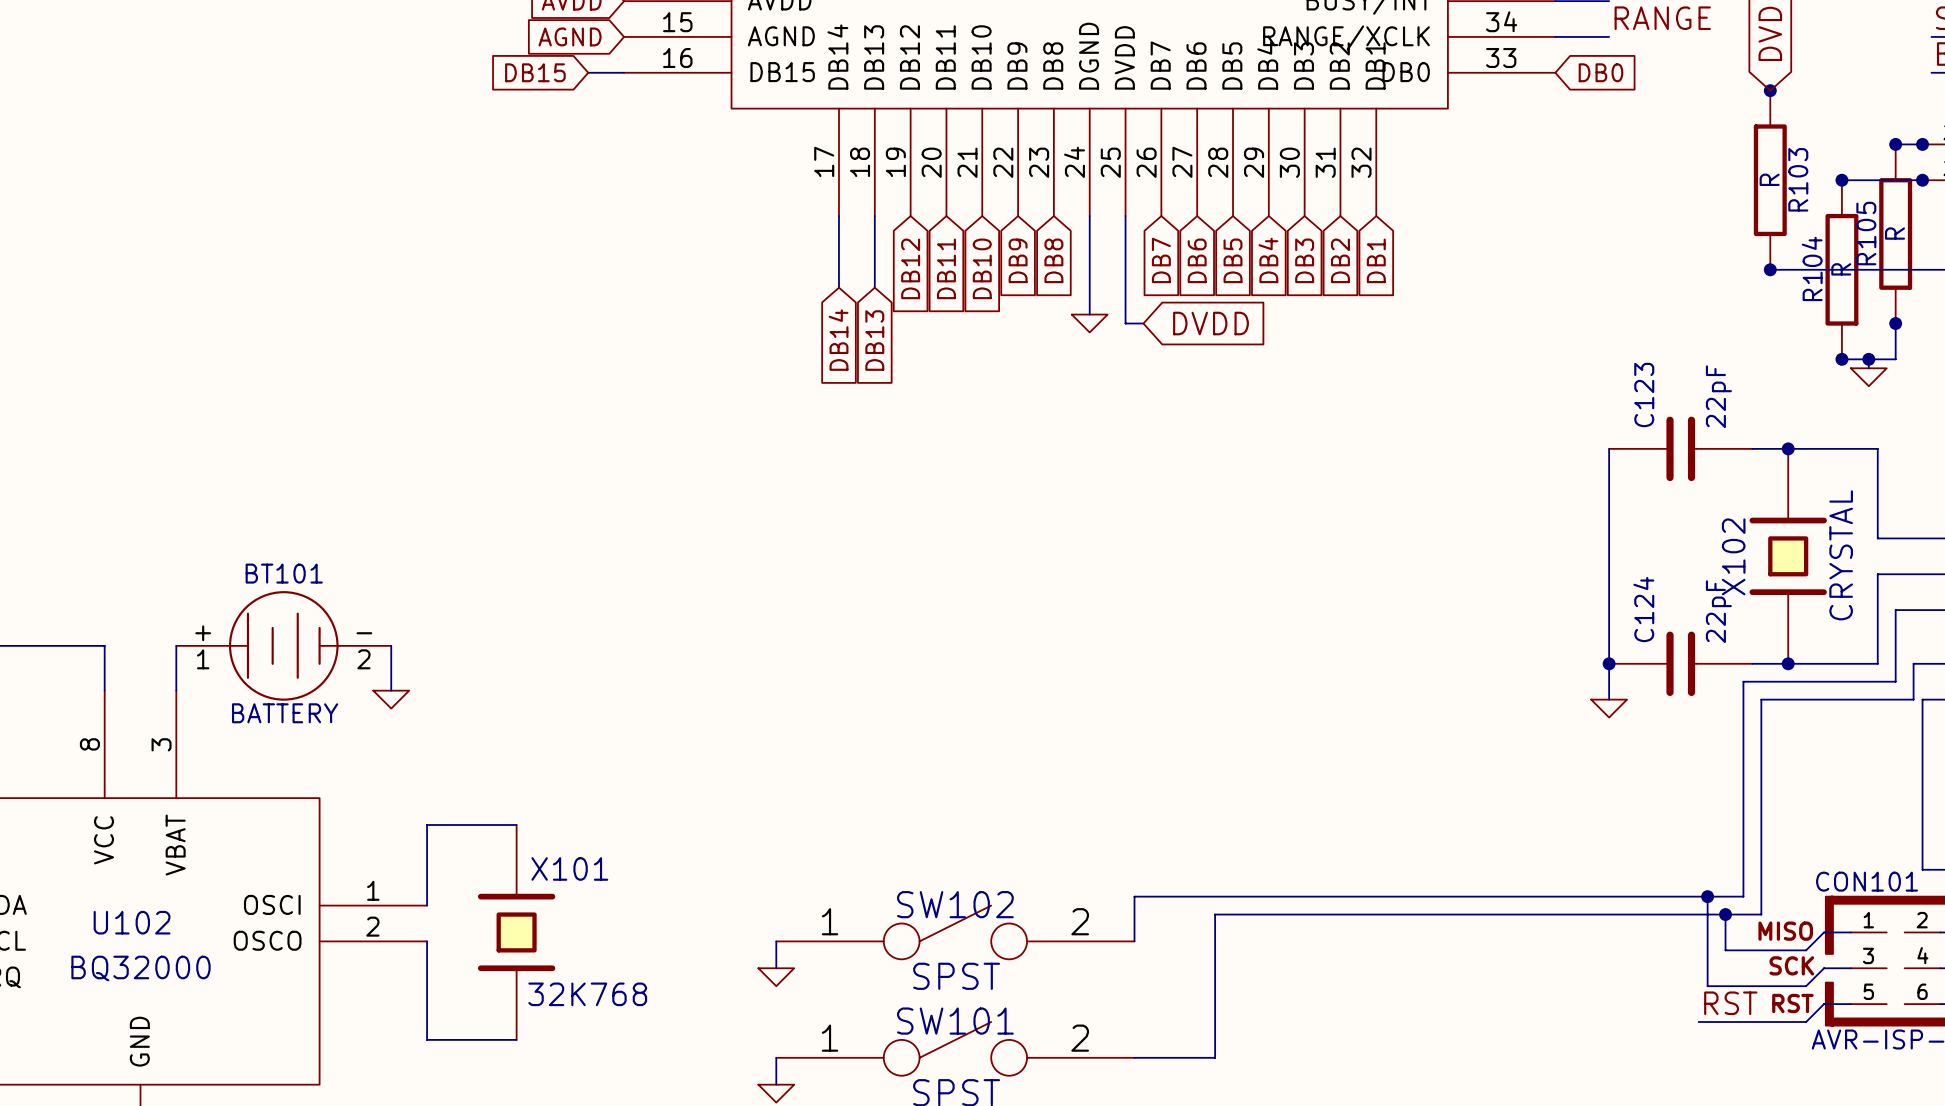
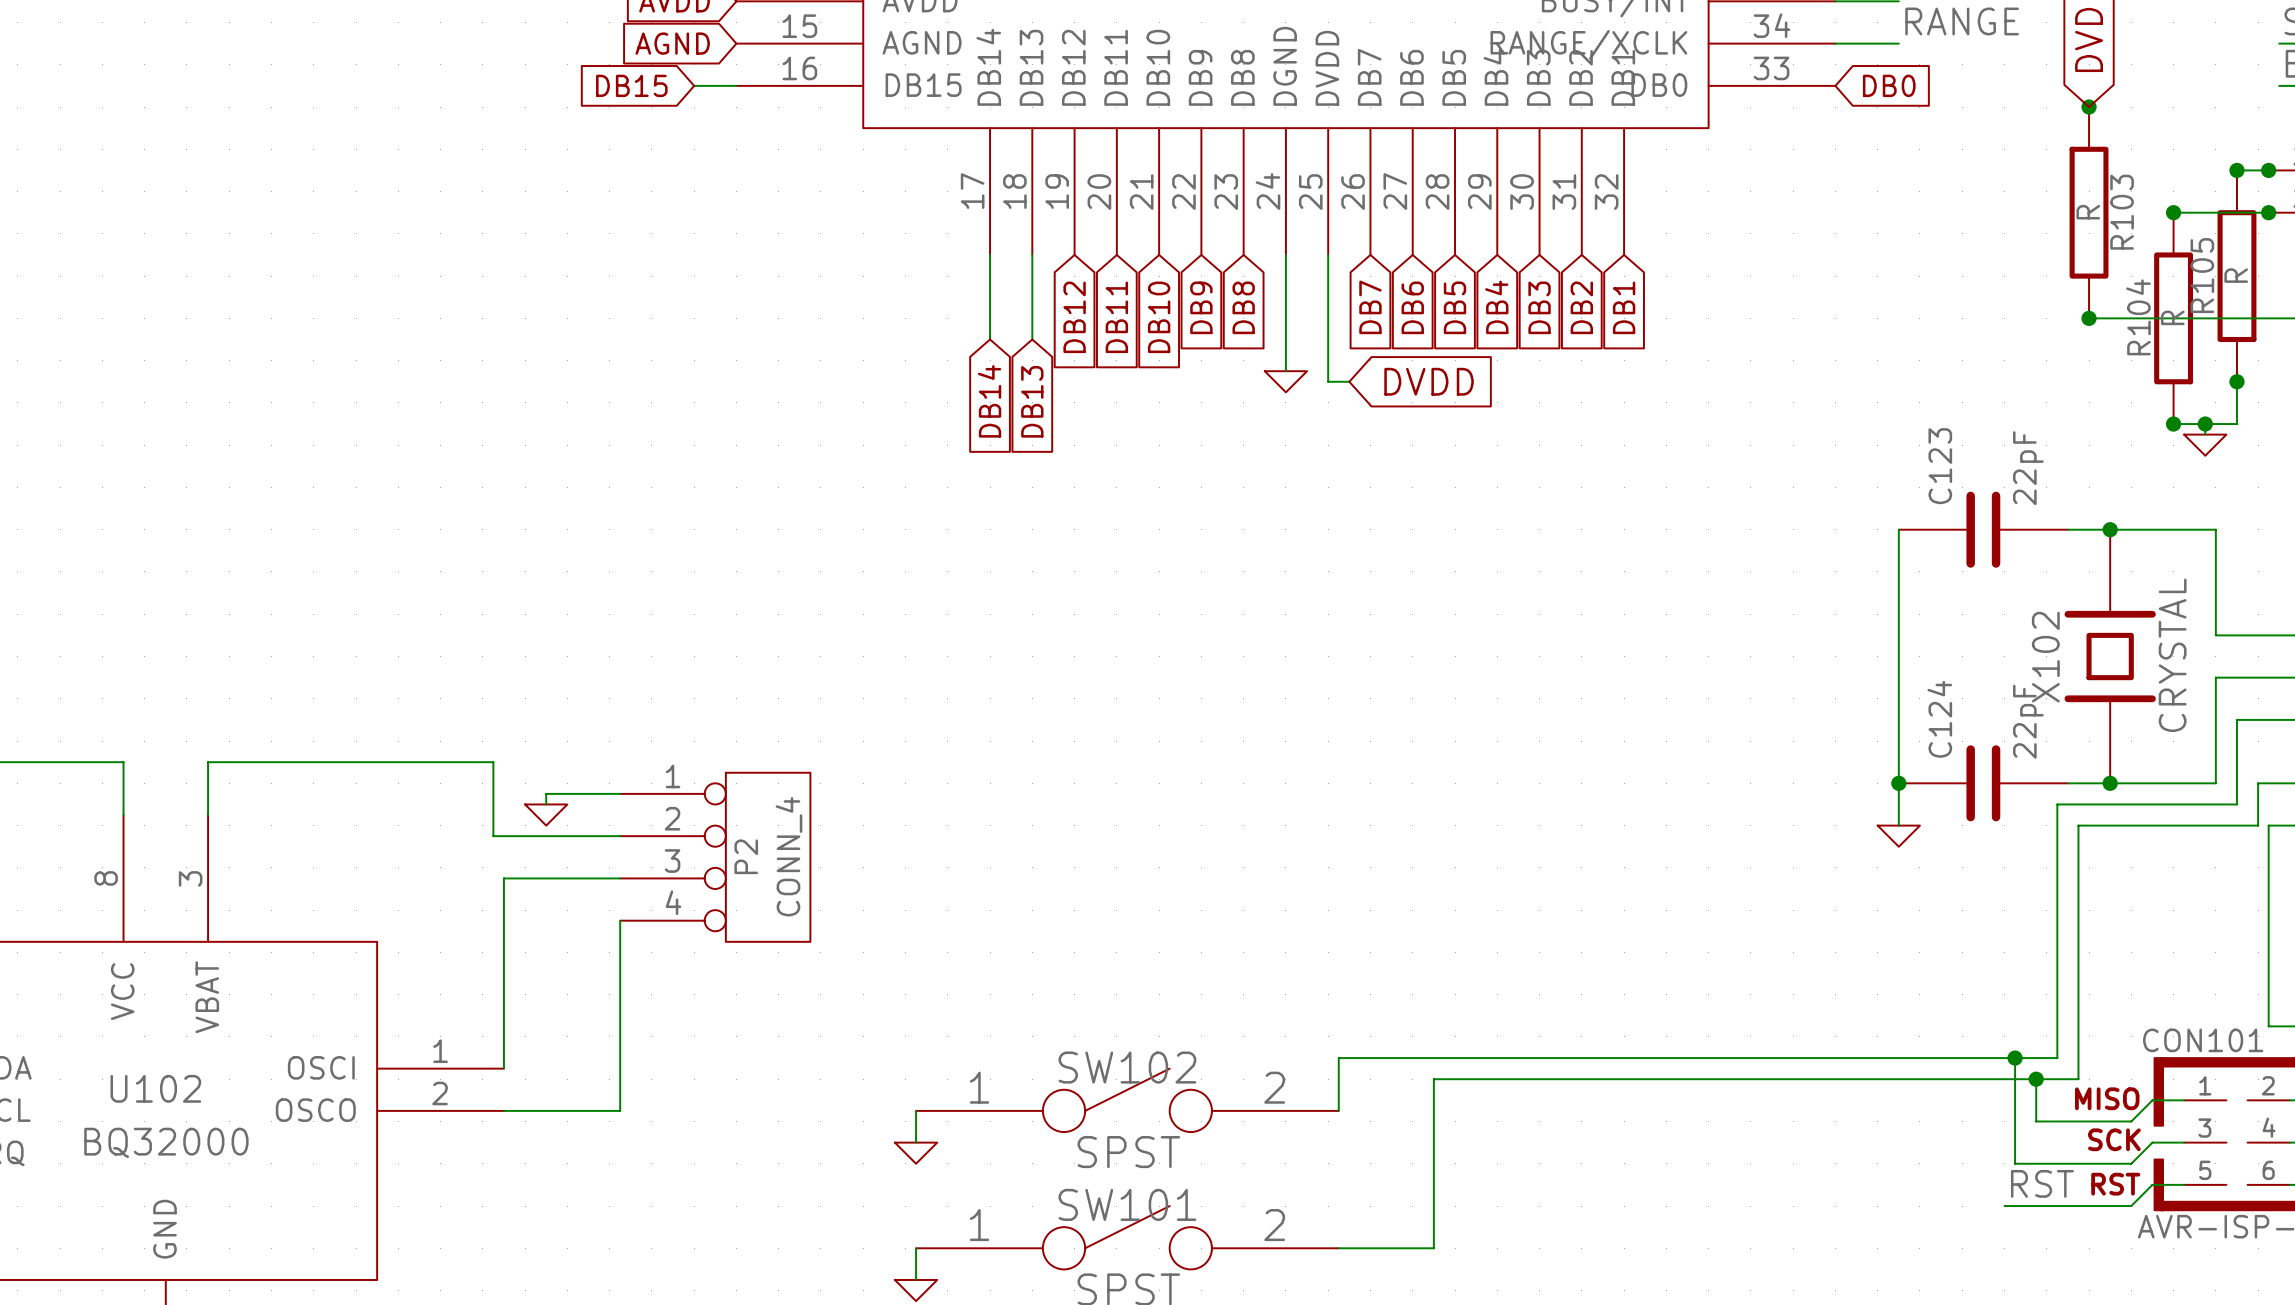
wire: none -> (208, 762) (493, 762) (493, 836) (620, 836)
BT101: BATTERY (283, 645) -> none
wire: (391, 645) (391, 690) -> none
wire: none -> (620, 793) (546, 793) (546, 804)
power symbol position: (391, 699) -> (546, 815)
P2: none -> CONN_4 (715, 857)
wire: (427, 824) (516, 824) -> (503, 973) (503, 878) (620, 878)
X101: 32K768 (516, 932) -> none
wire: (427, 941) (427, 1039) (516, 1039) -> (503, 1110) (620, 1110) (620, 920)

